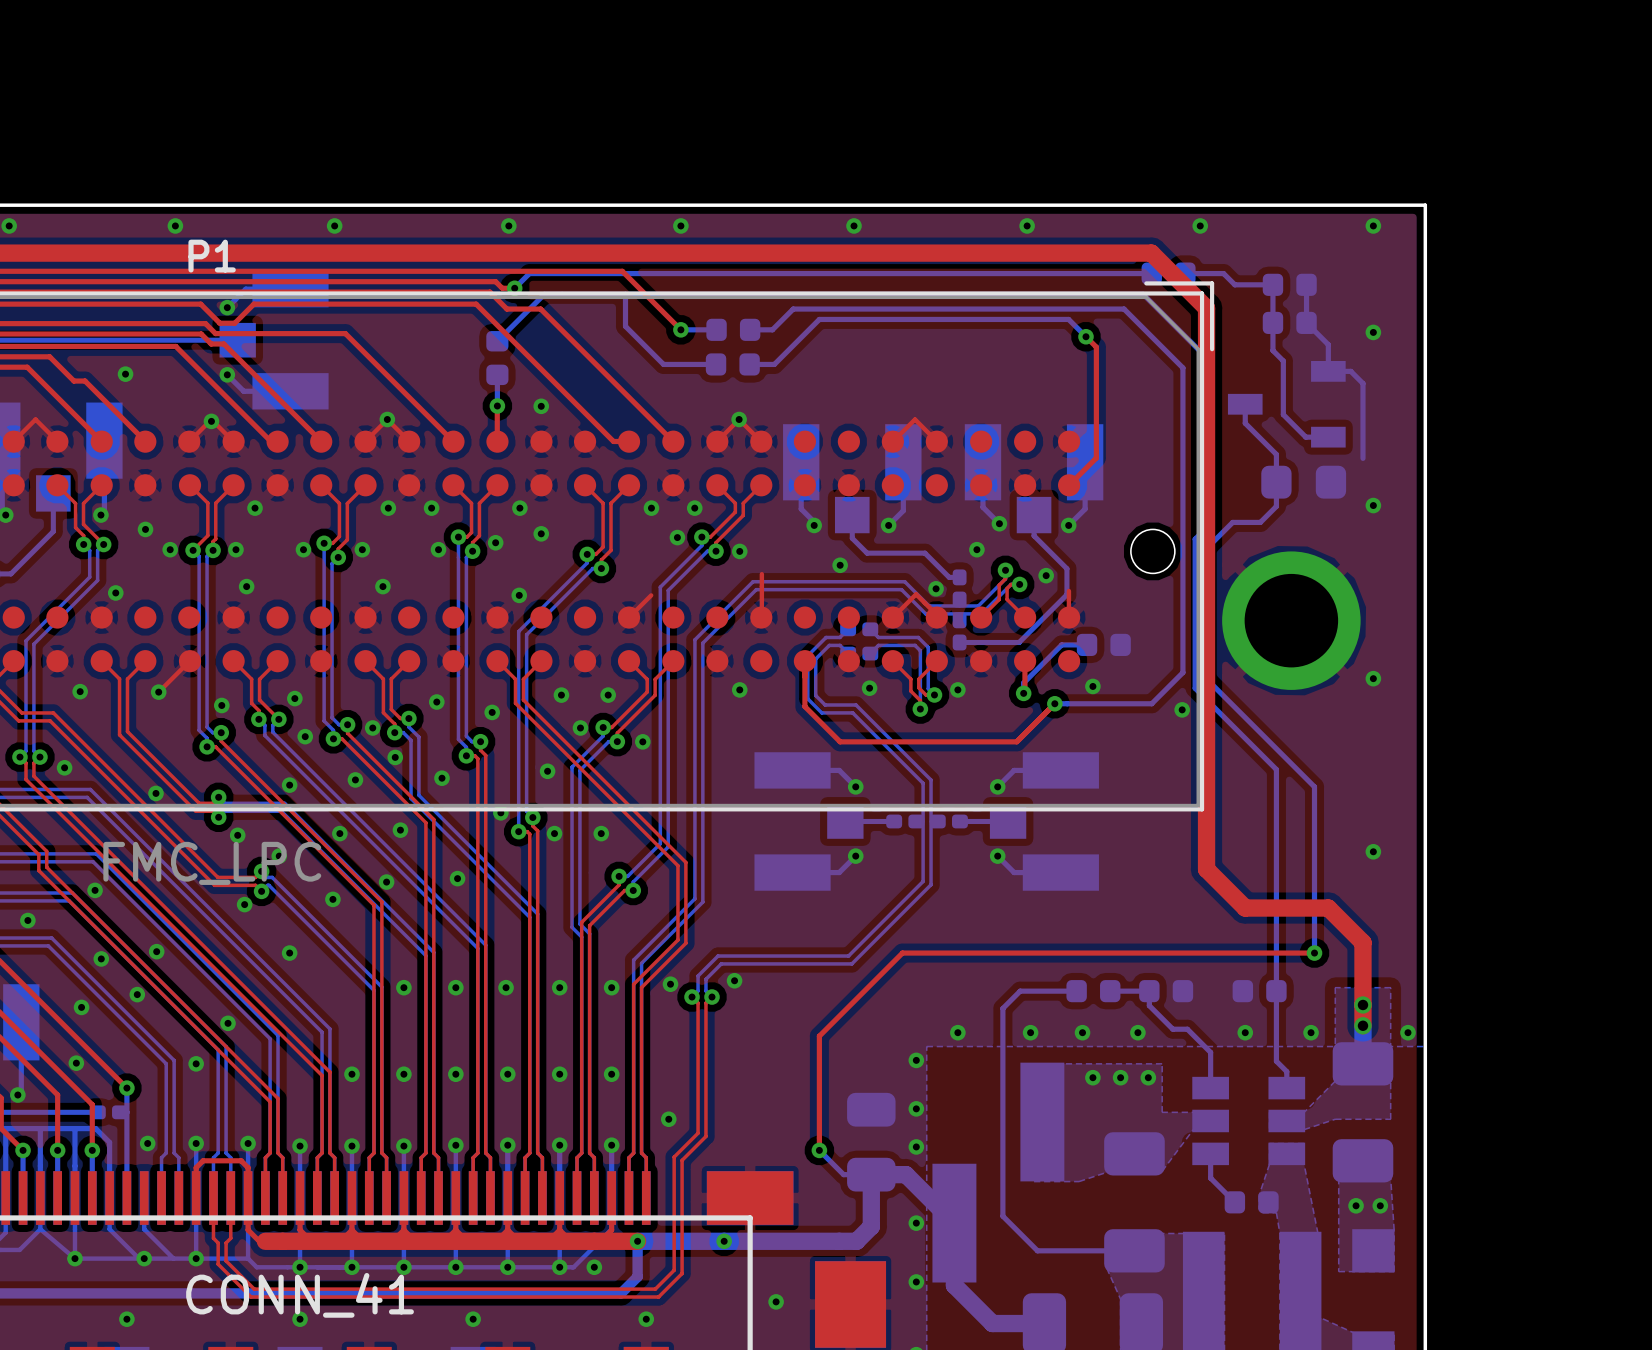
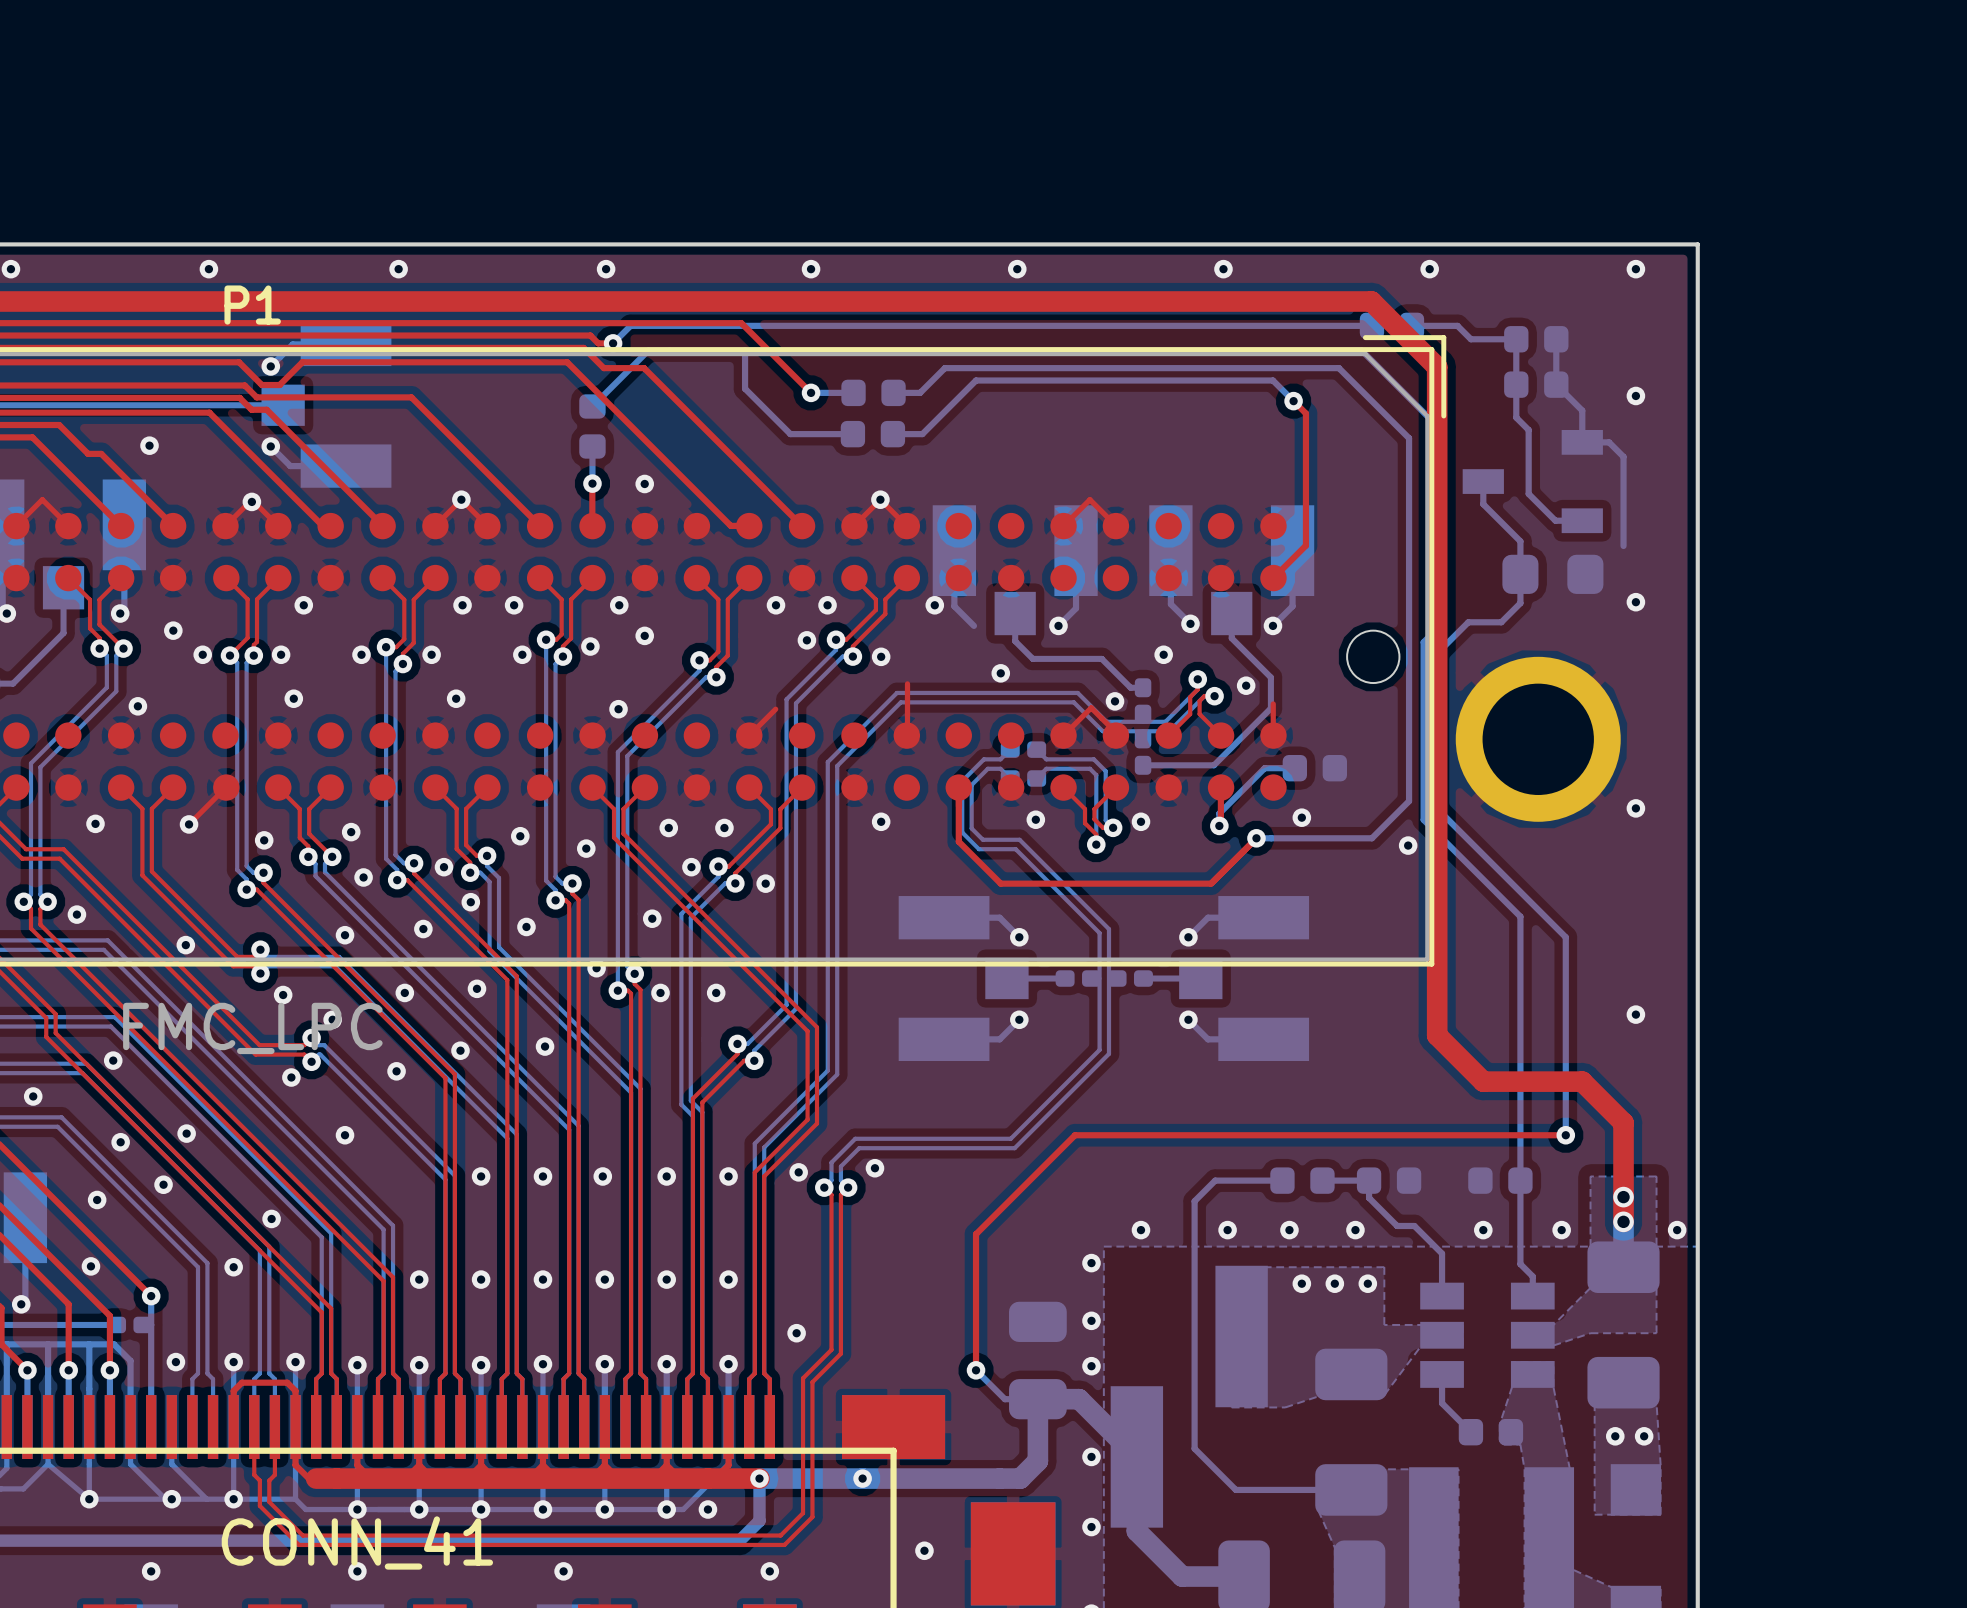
via position: (814, 525) -> (934, 605)

